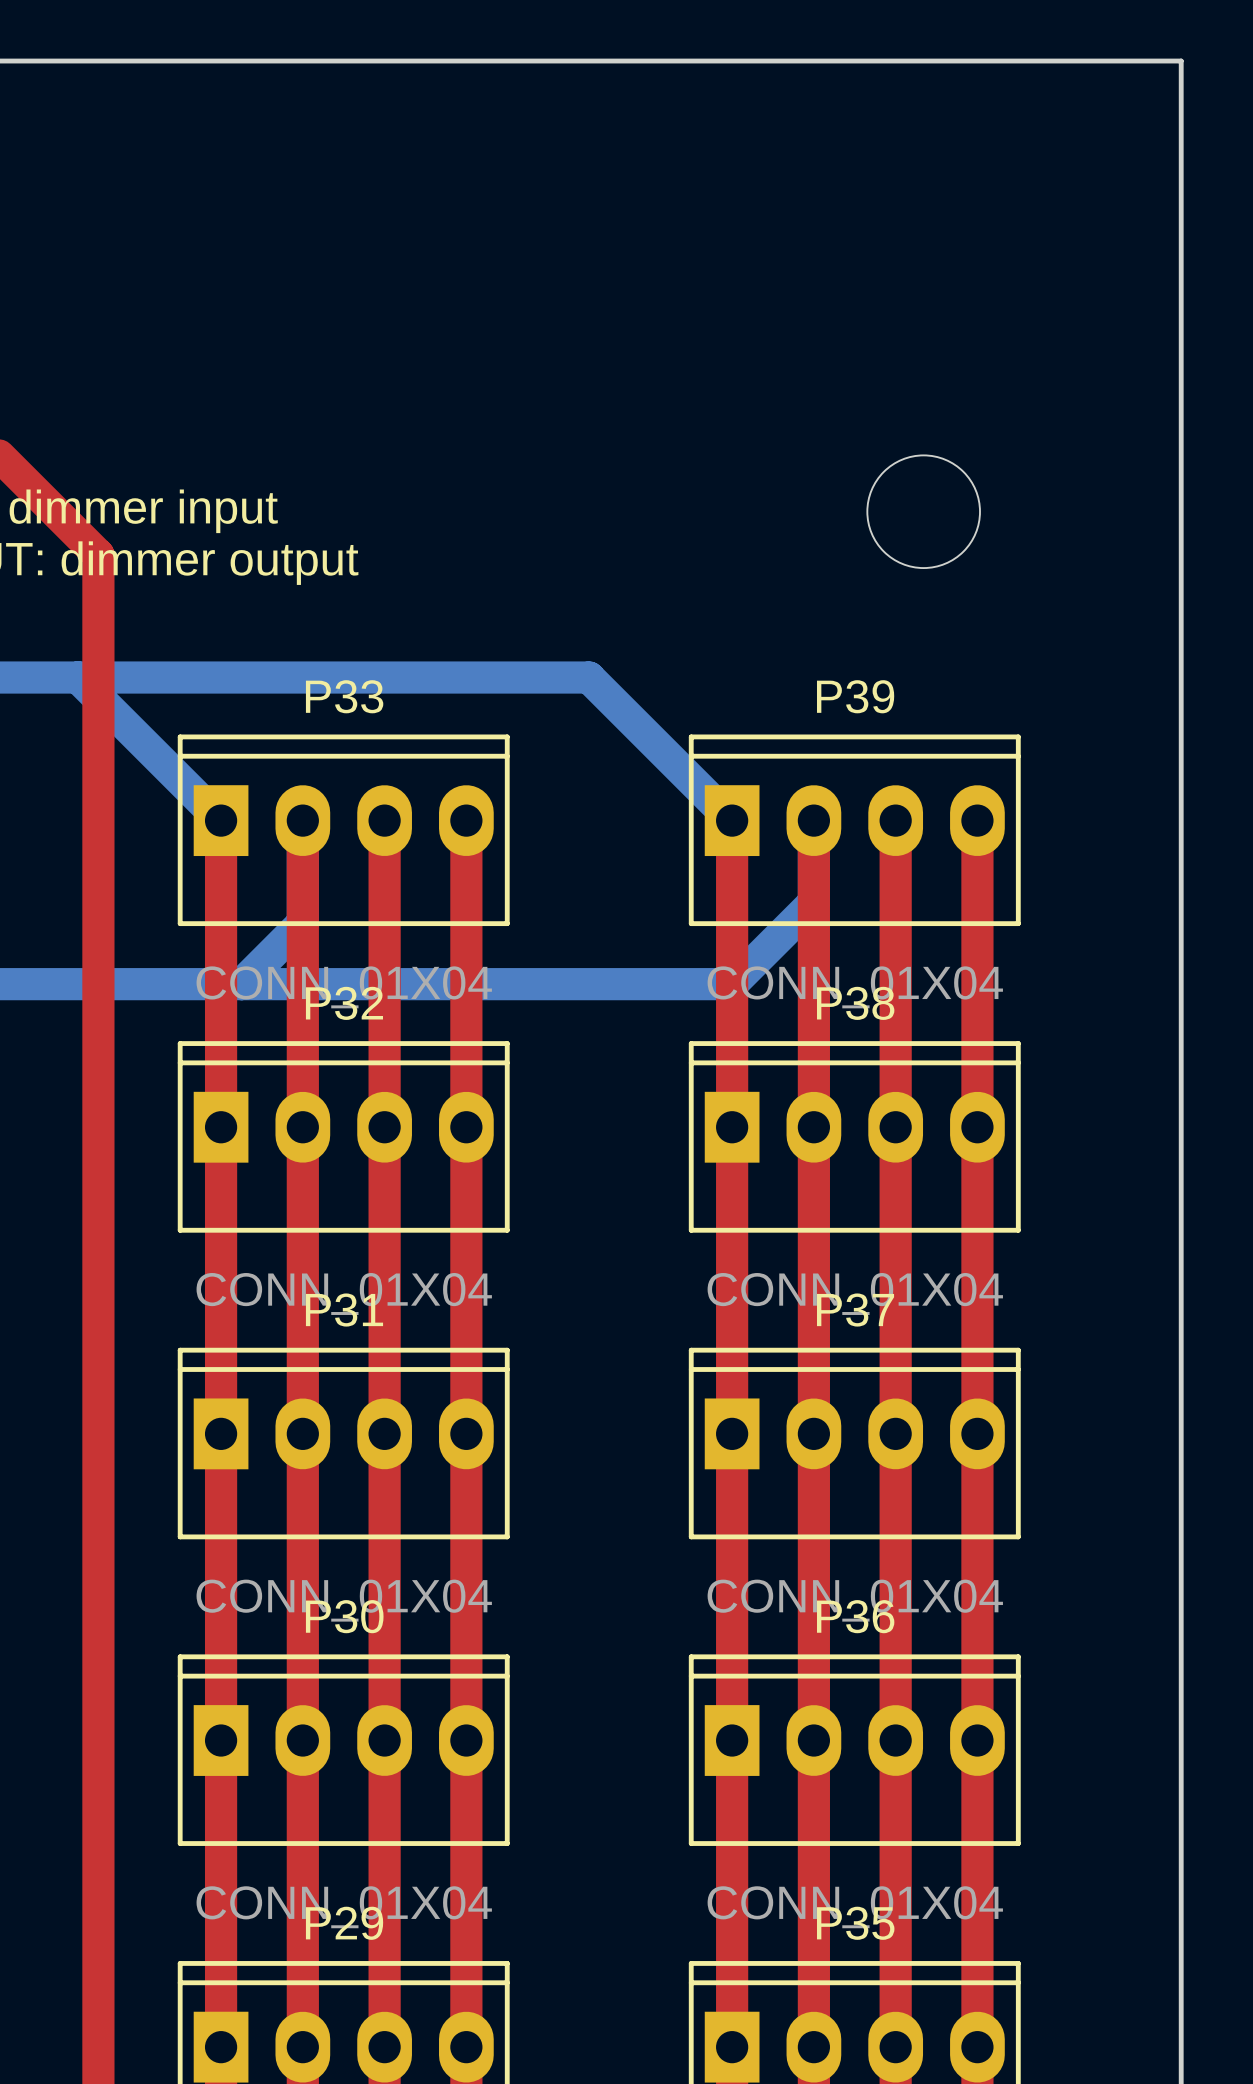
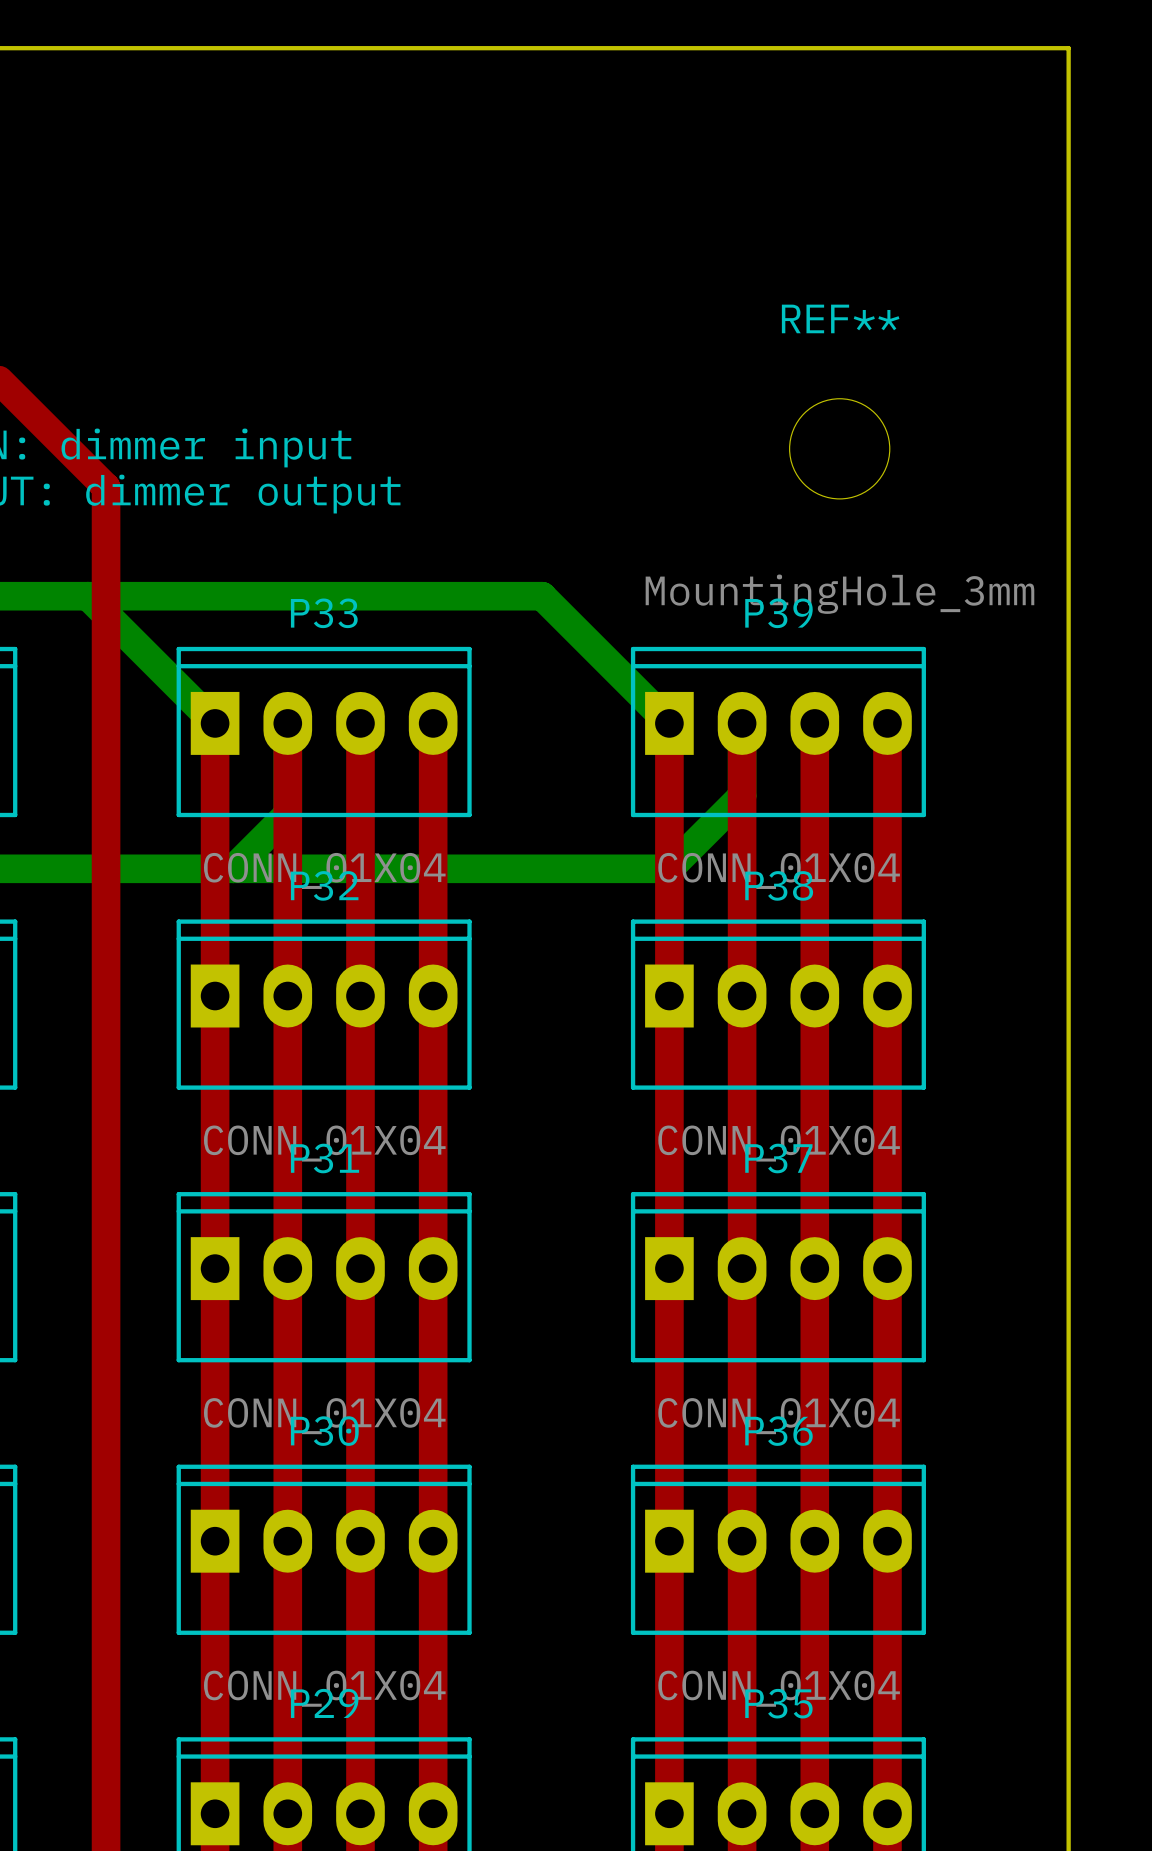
REF** name: none -> REF** (840, 318)
REF** value: none -> MountingHole_3mm (839, 594)

